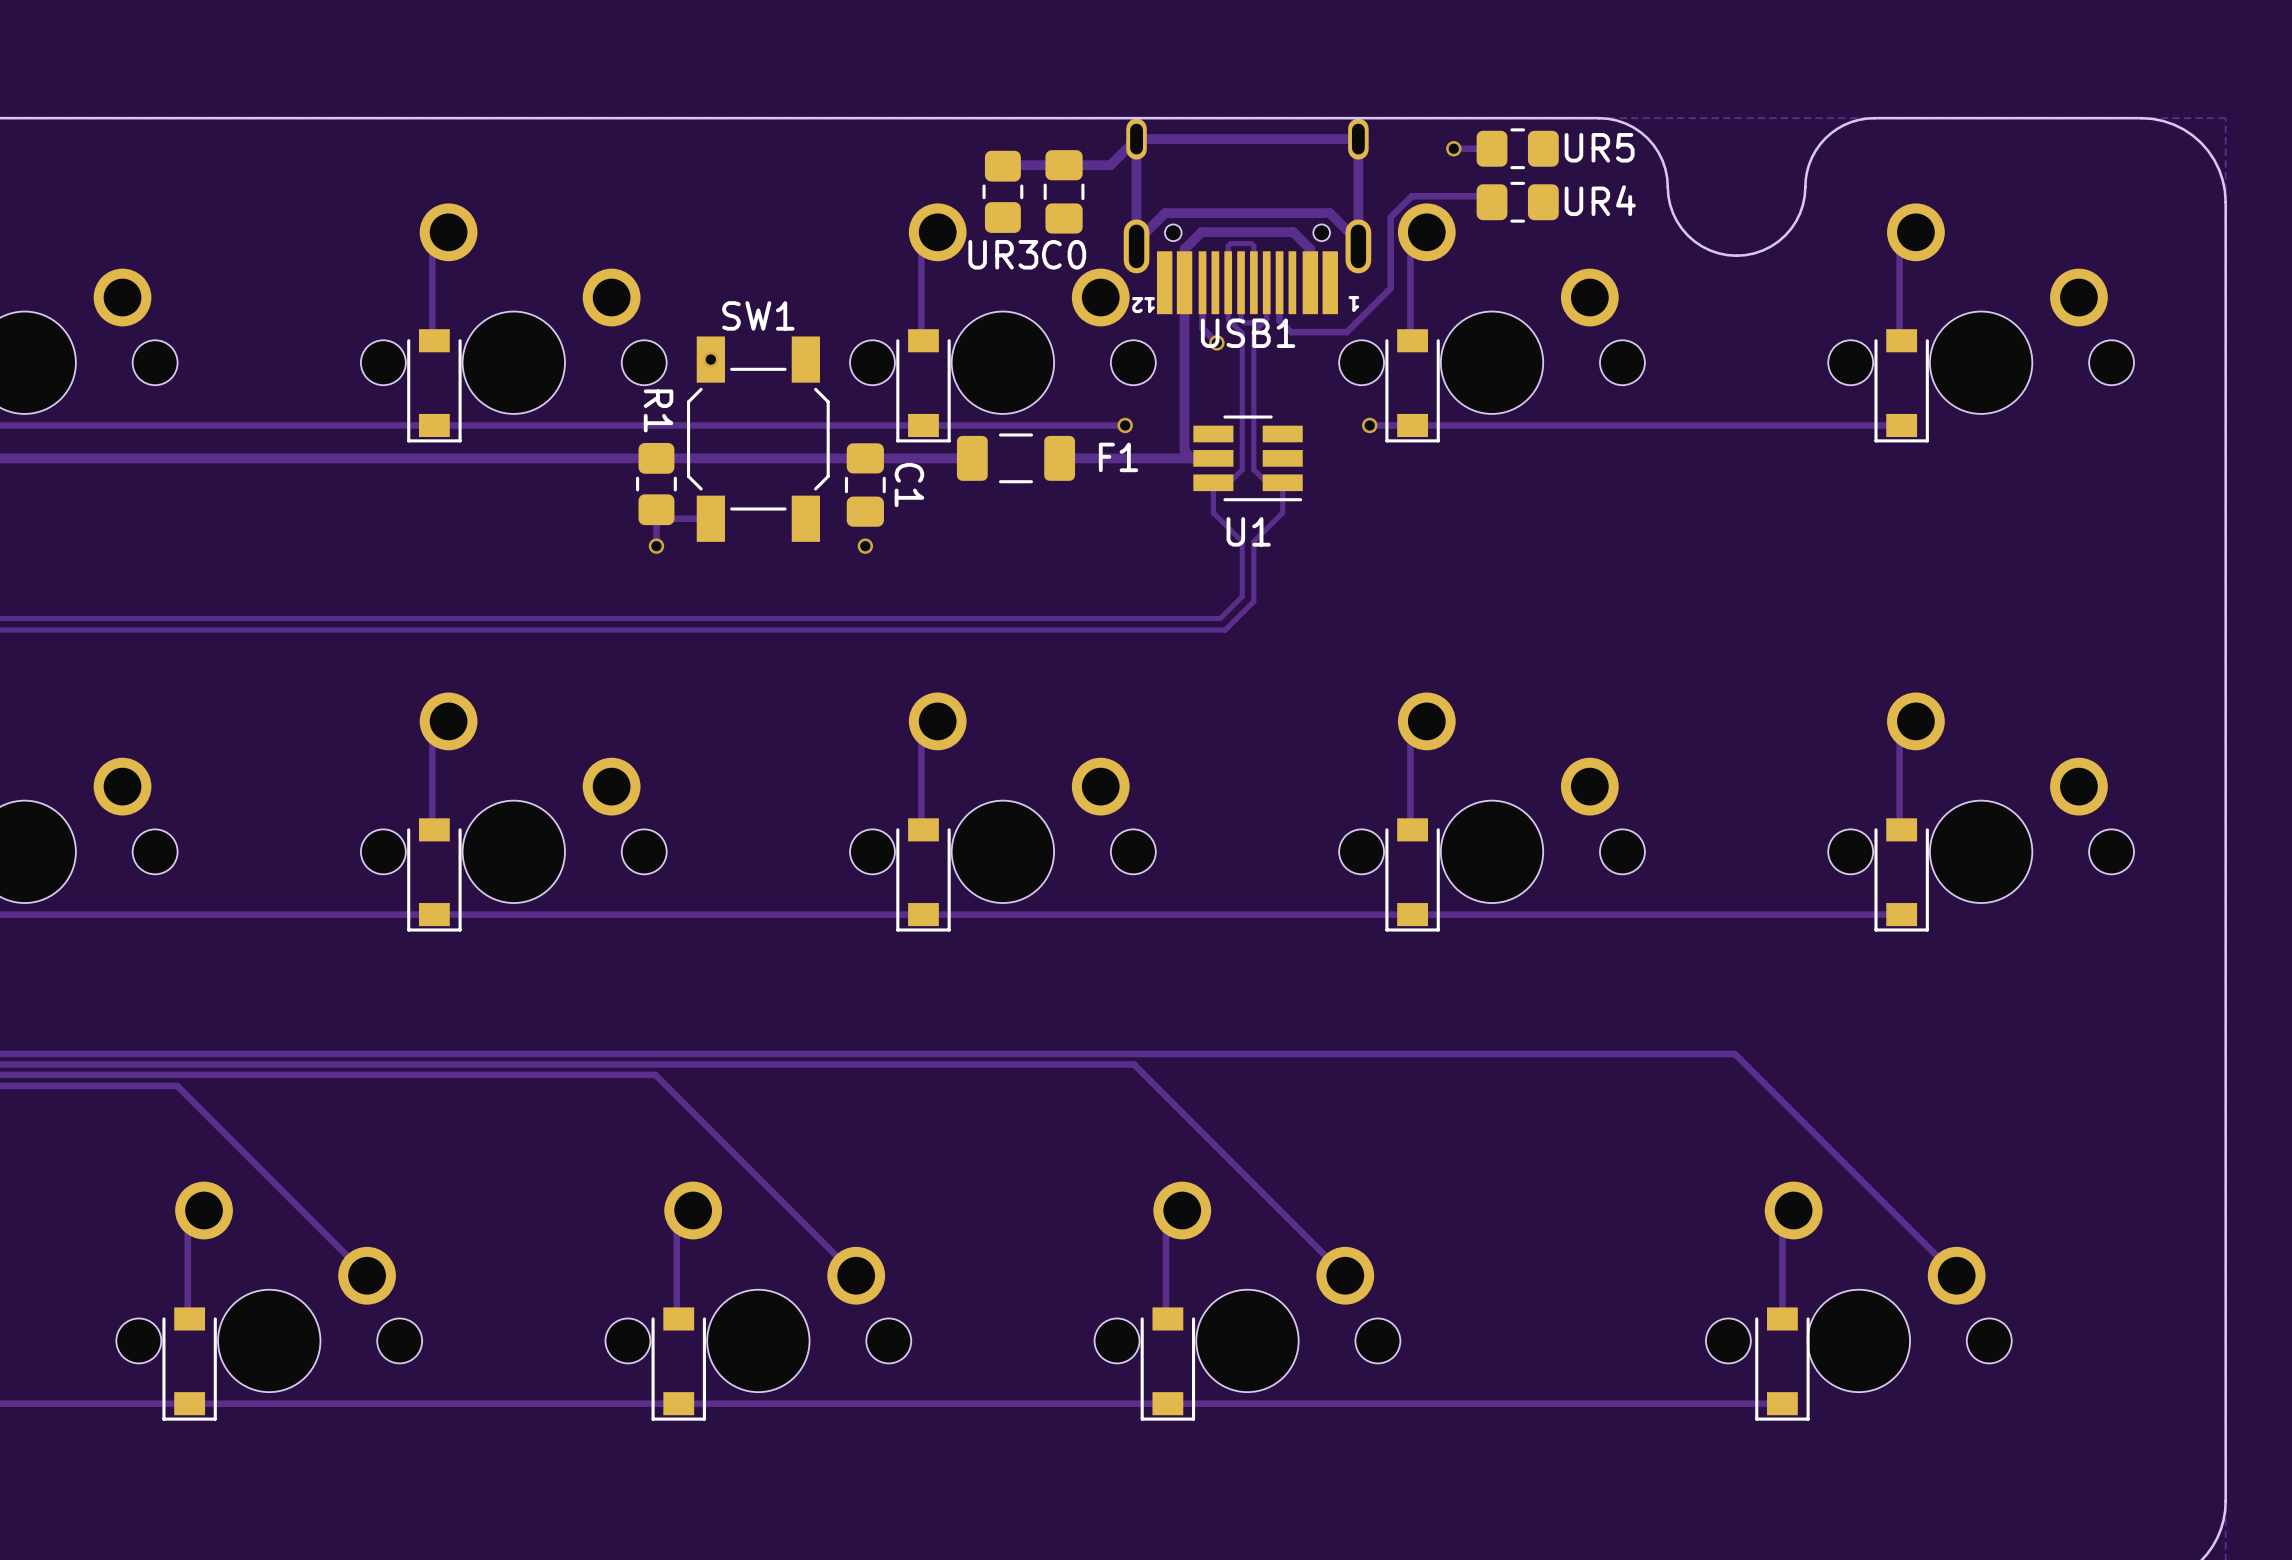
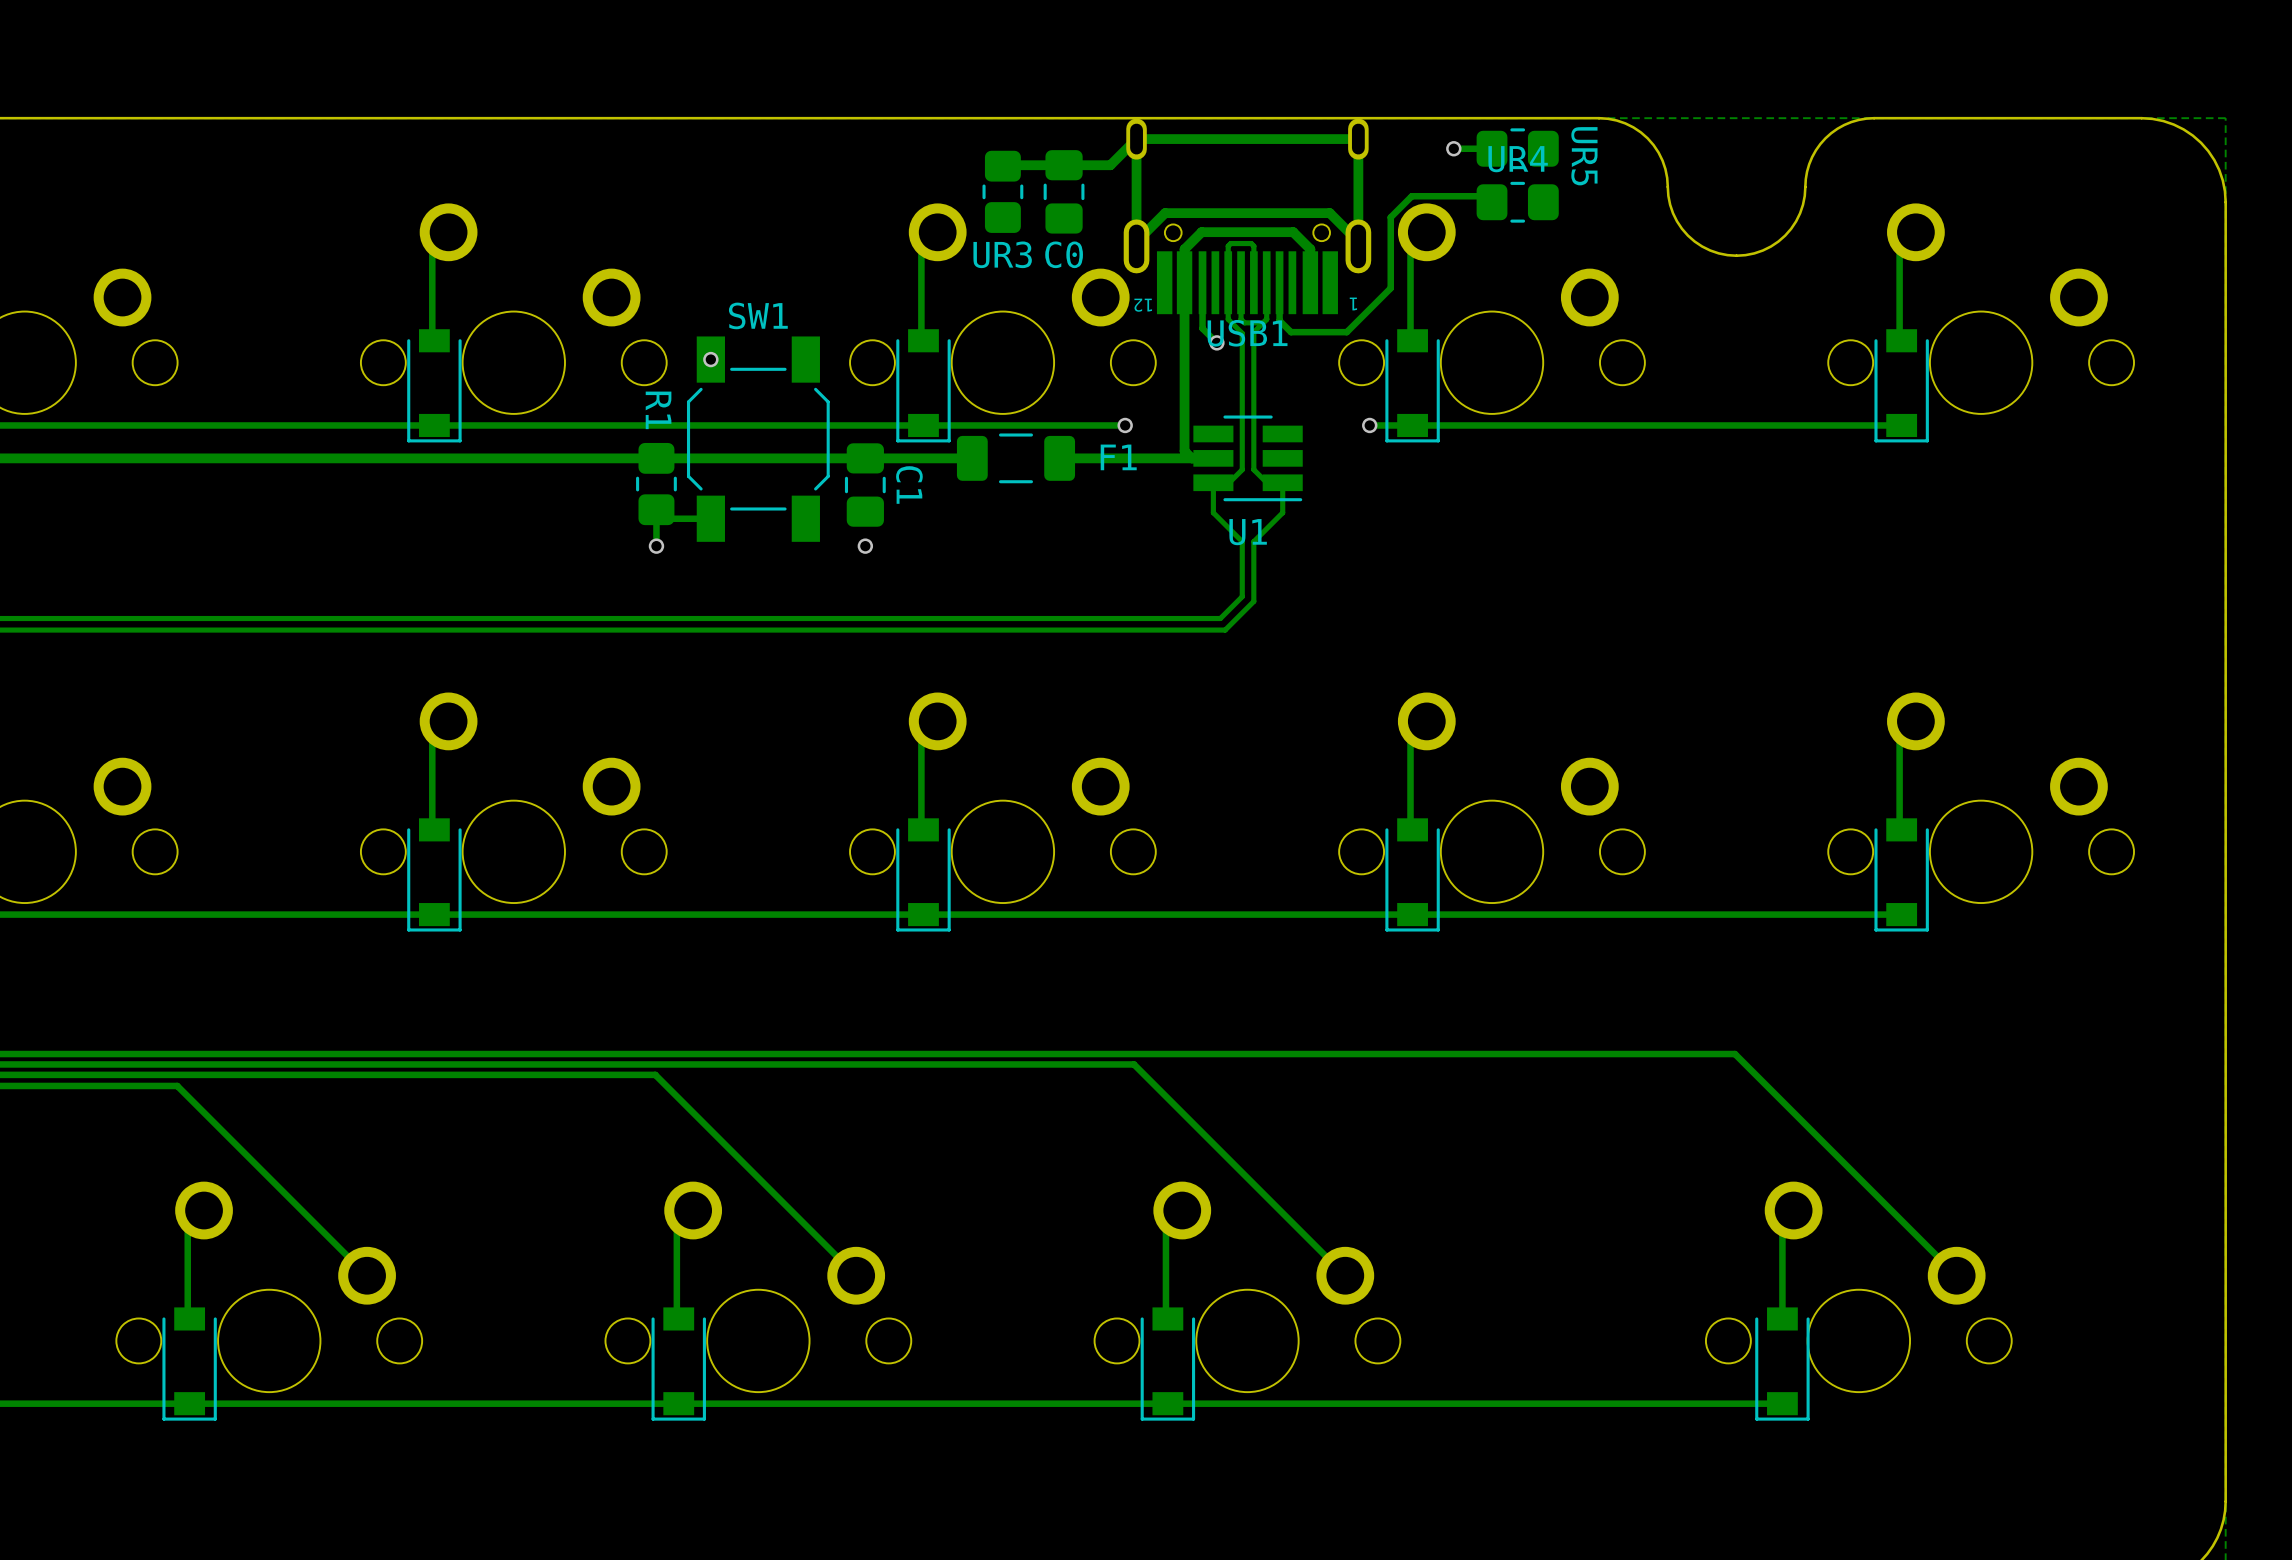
UR5 name rotation: 0° (1599, 147) -> 90° clockwise (1584, 156)
UR4 name position: UR4 (1600, 200) -> UR4 (1518, 159)

